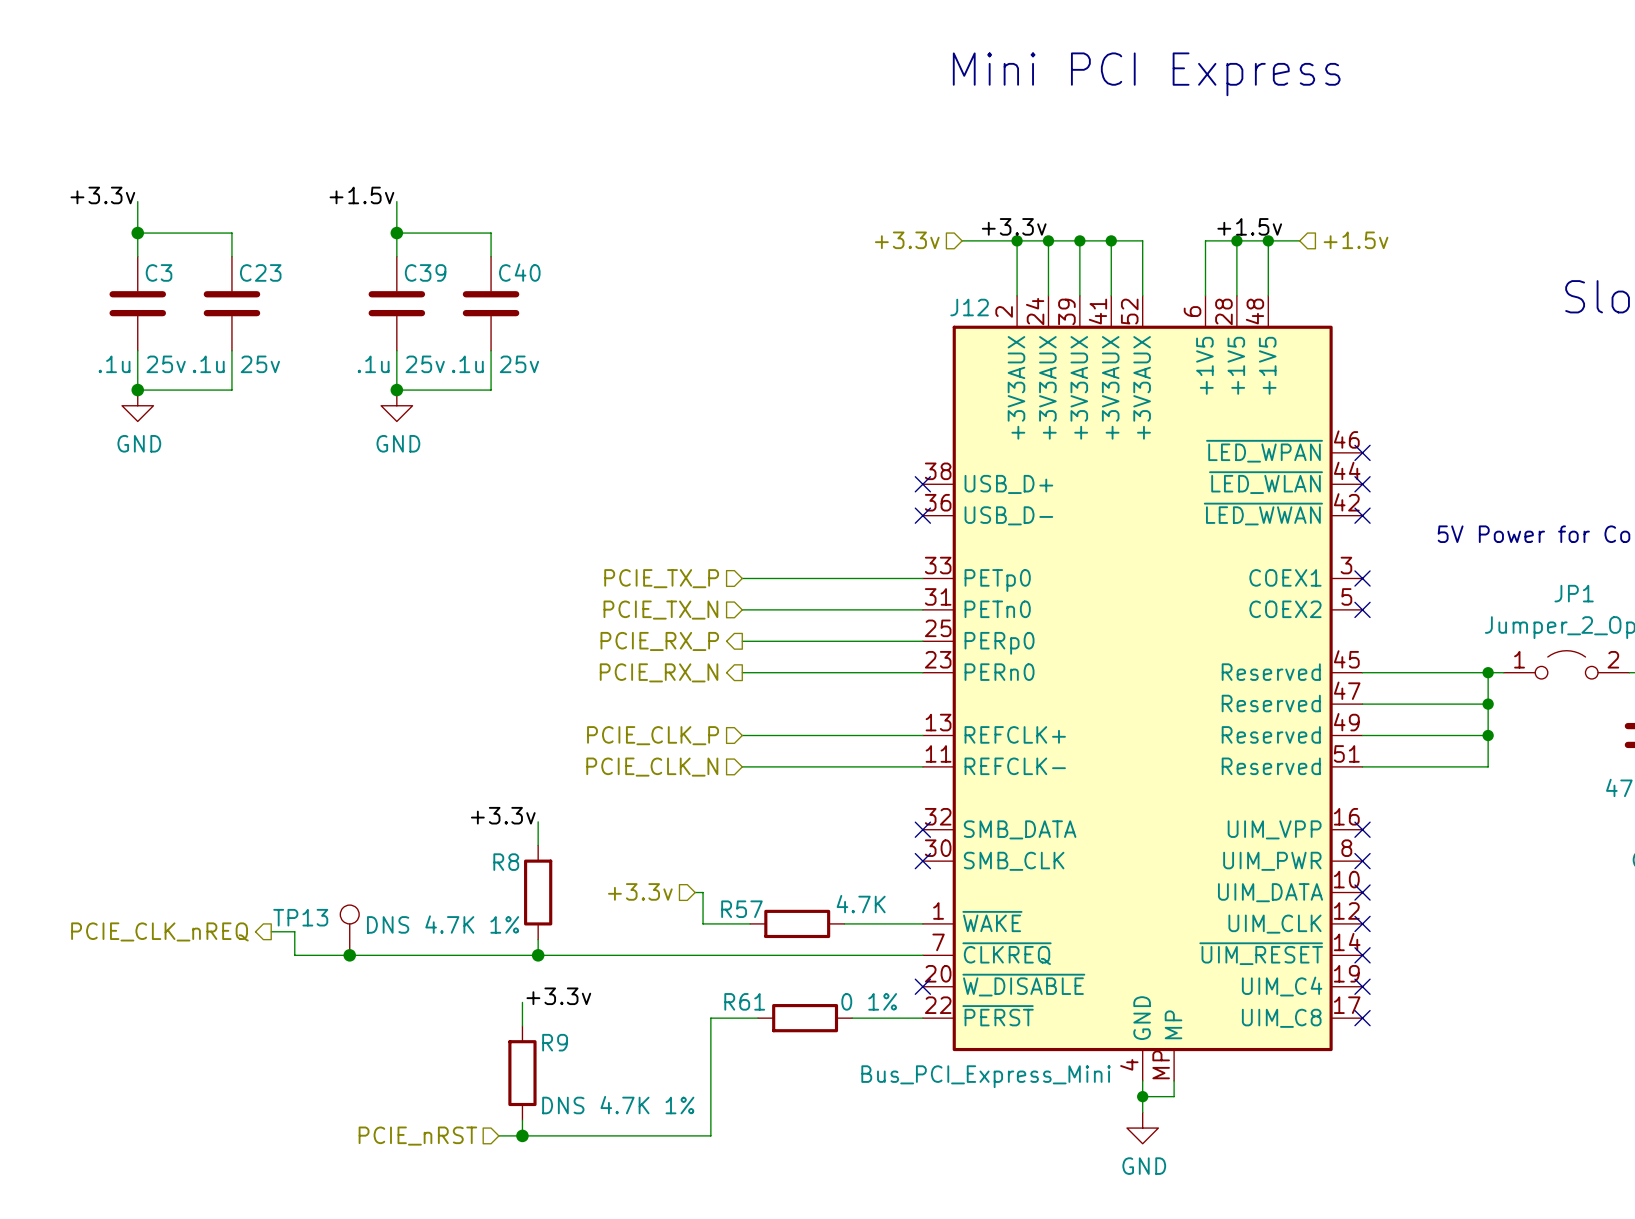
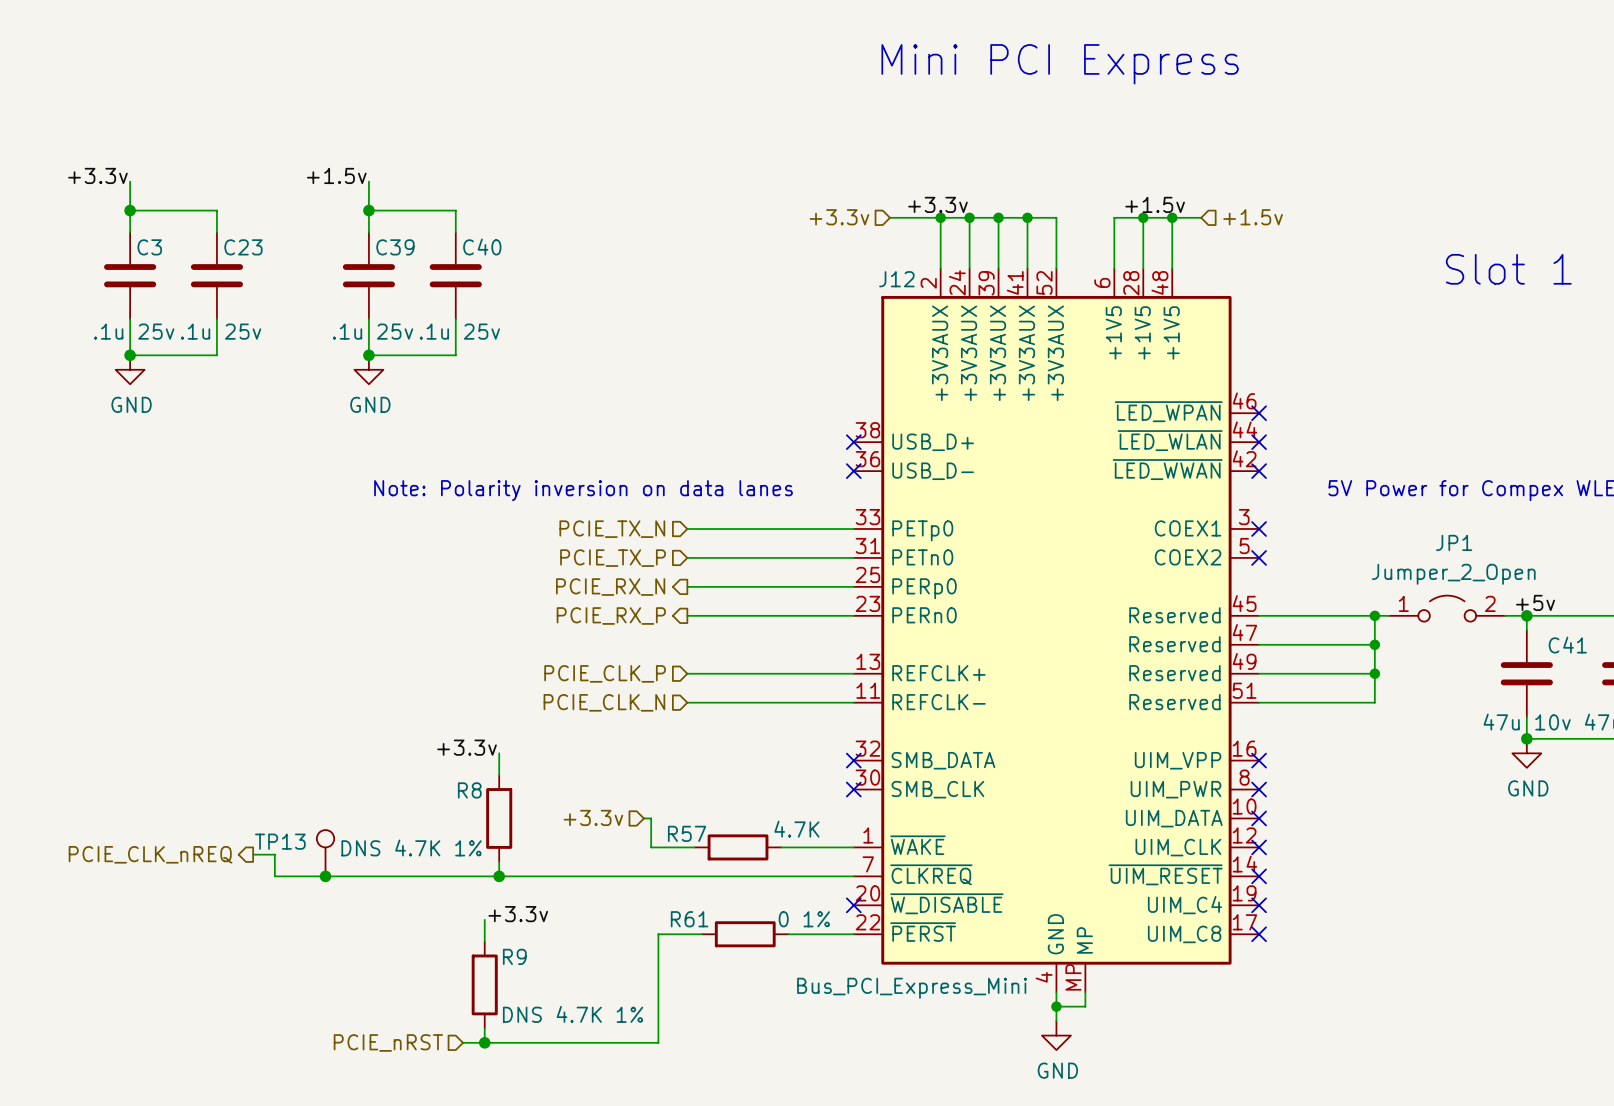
text: none -> Note: Polarity inversion on data lanes (583, 490)
hierarchical label: PCIE_TX_P (661, 578) -> PCIE_TX_N (612, 529)
hierarchical label: PCIE_TX_N (660, 610) -> PCIE_TX_P (613, 558)
hierarchical label: PCIE_RX_P (659, 641) -> PCIE_RX_N (610, 587)
hierarchical label: PCIE_RX_N (659, 672) -> PCIE_RX_P (611, 615)

